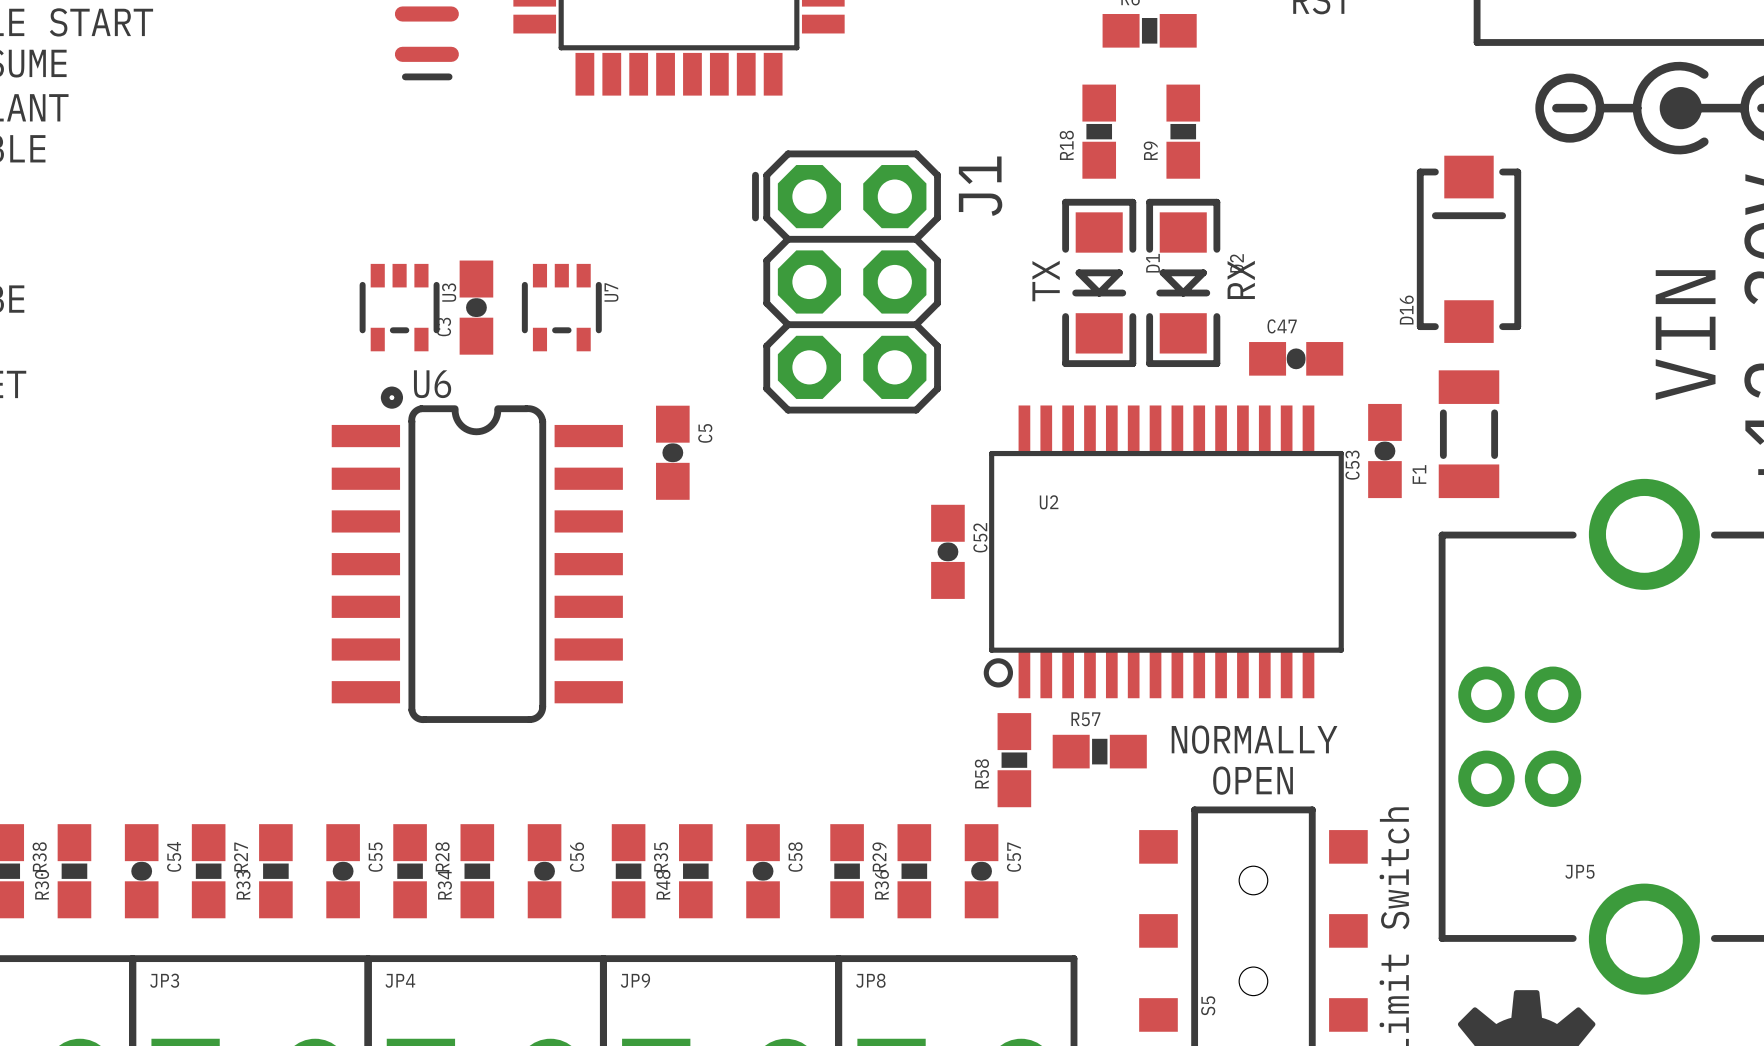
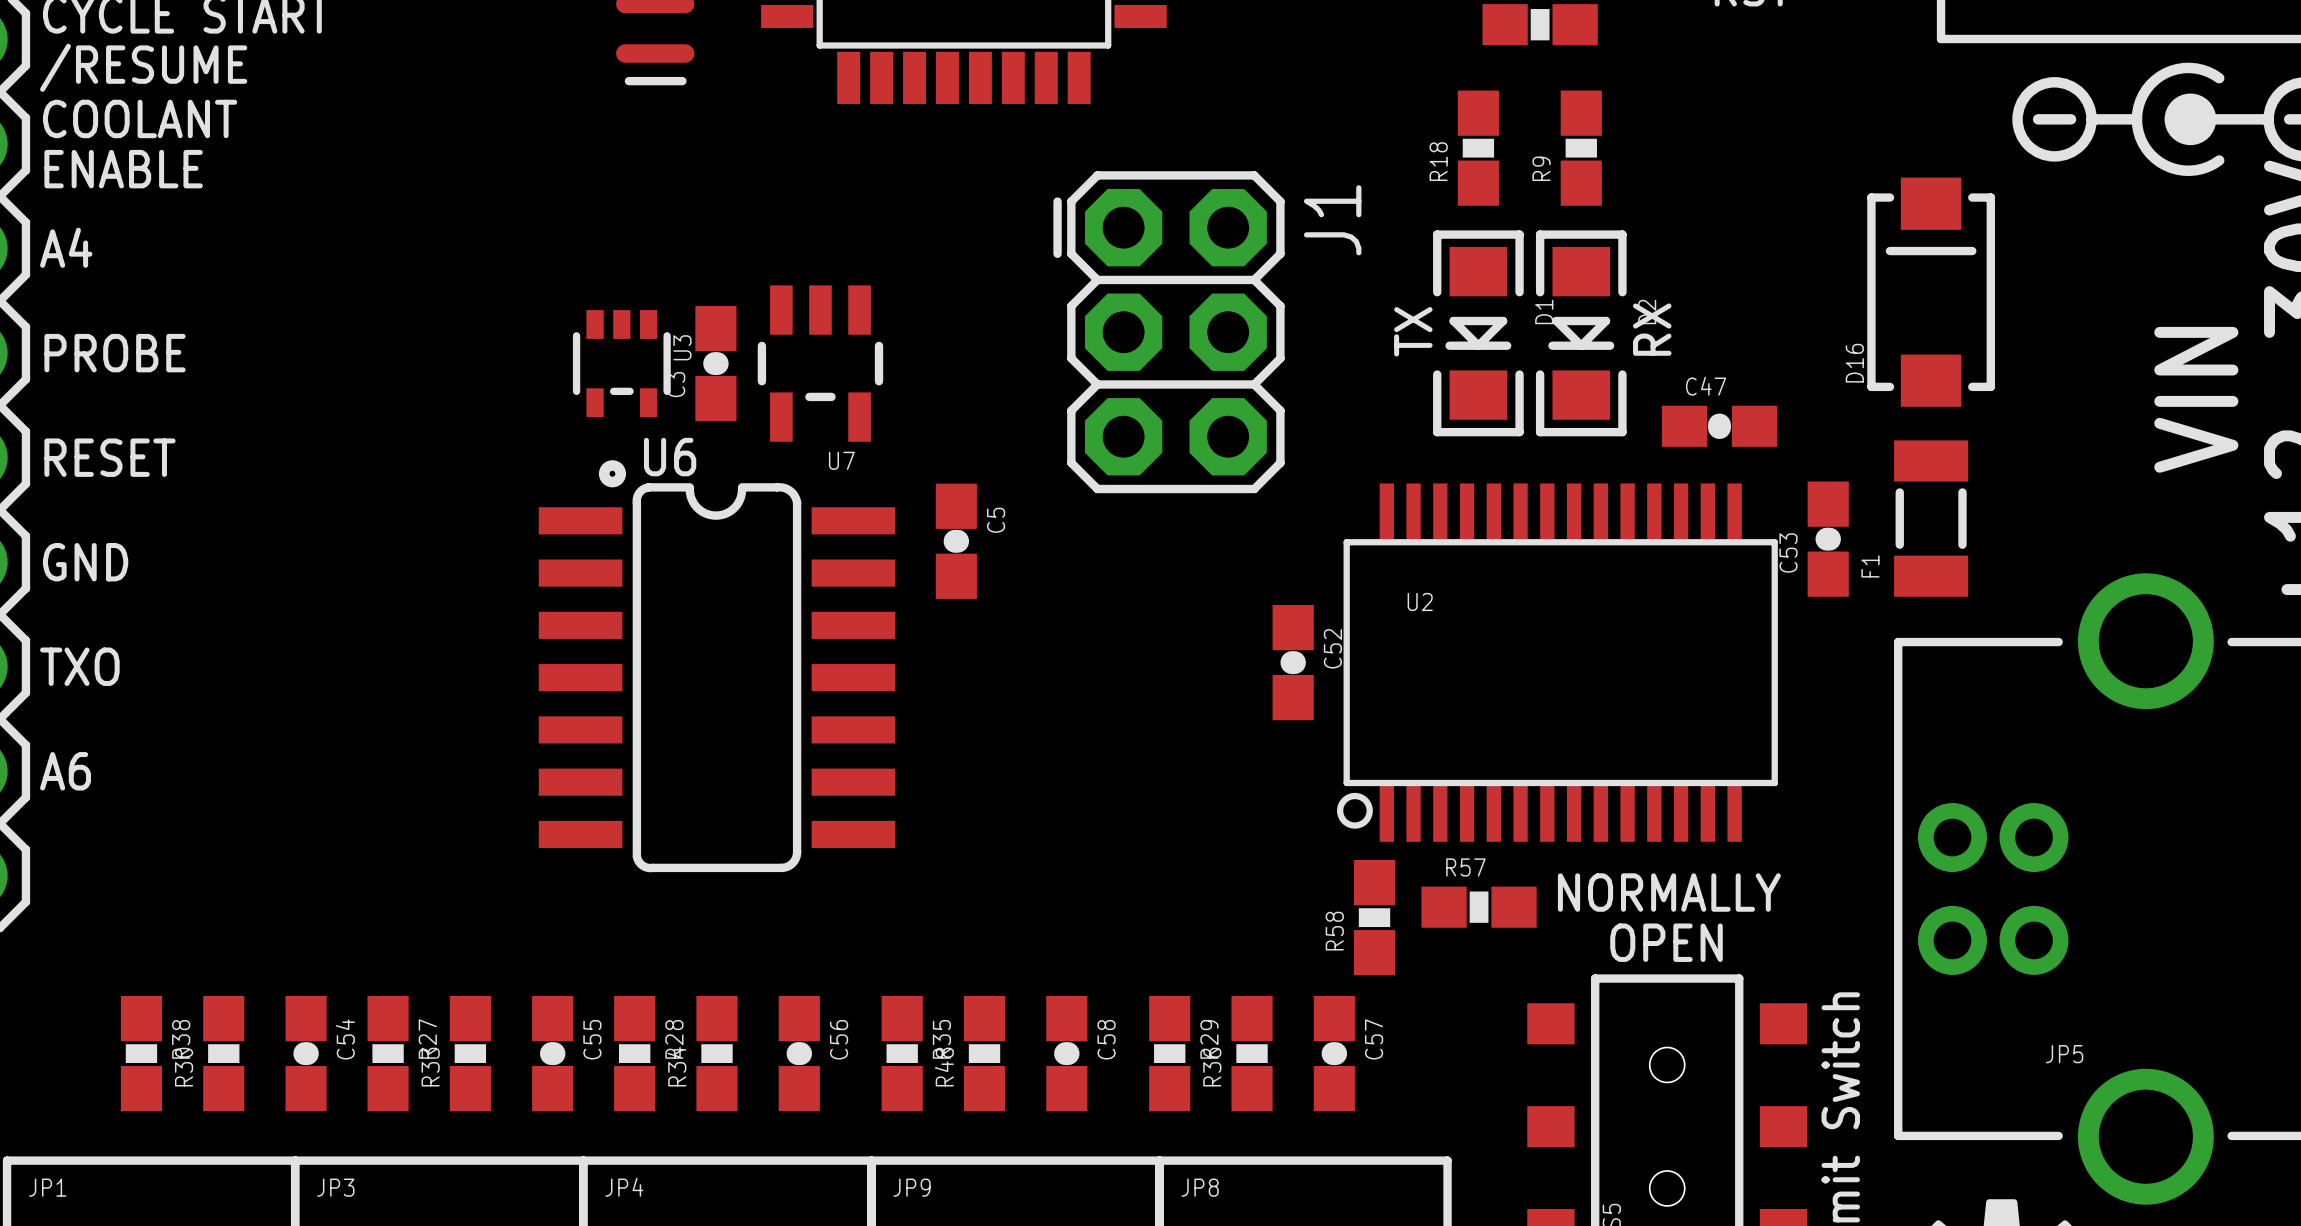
U7 footprint: [521, 263, 602, 352] -> [757, 285, 884, 442]
U7 name rotation: 0° (611, 292) -> 90° clockwise (841, 460)
U7 name position: U7 (611, 292) -> U7 (841, 460)

